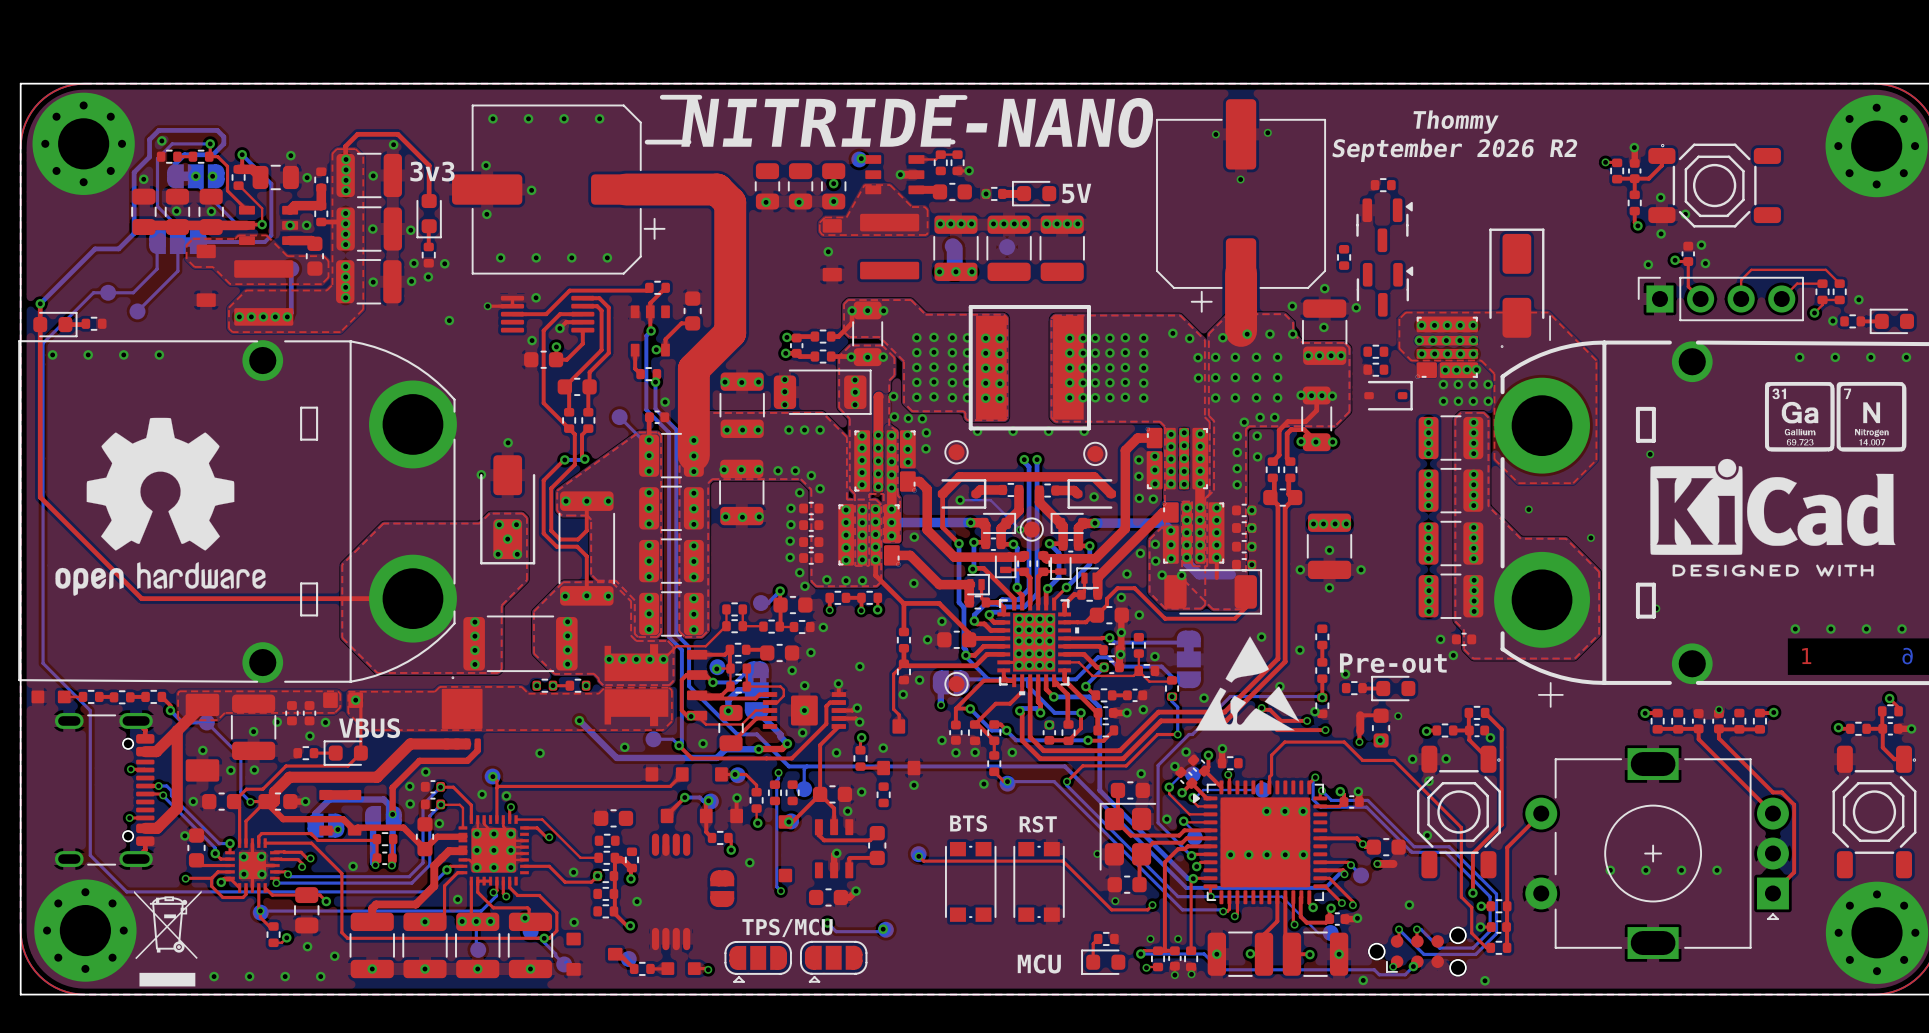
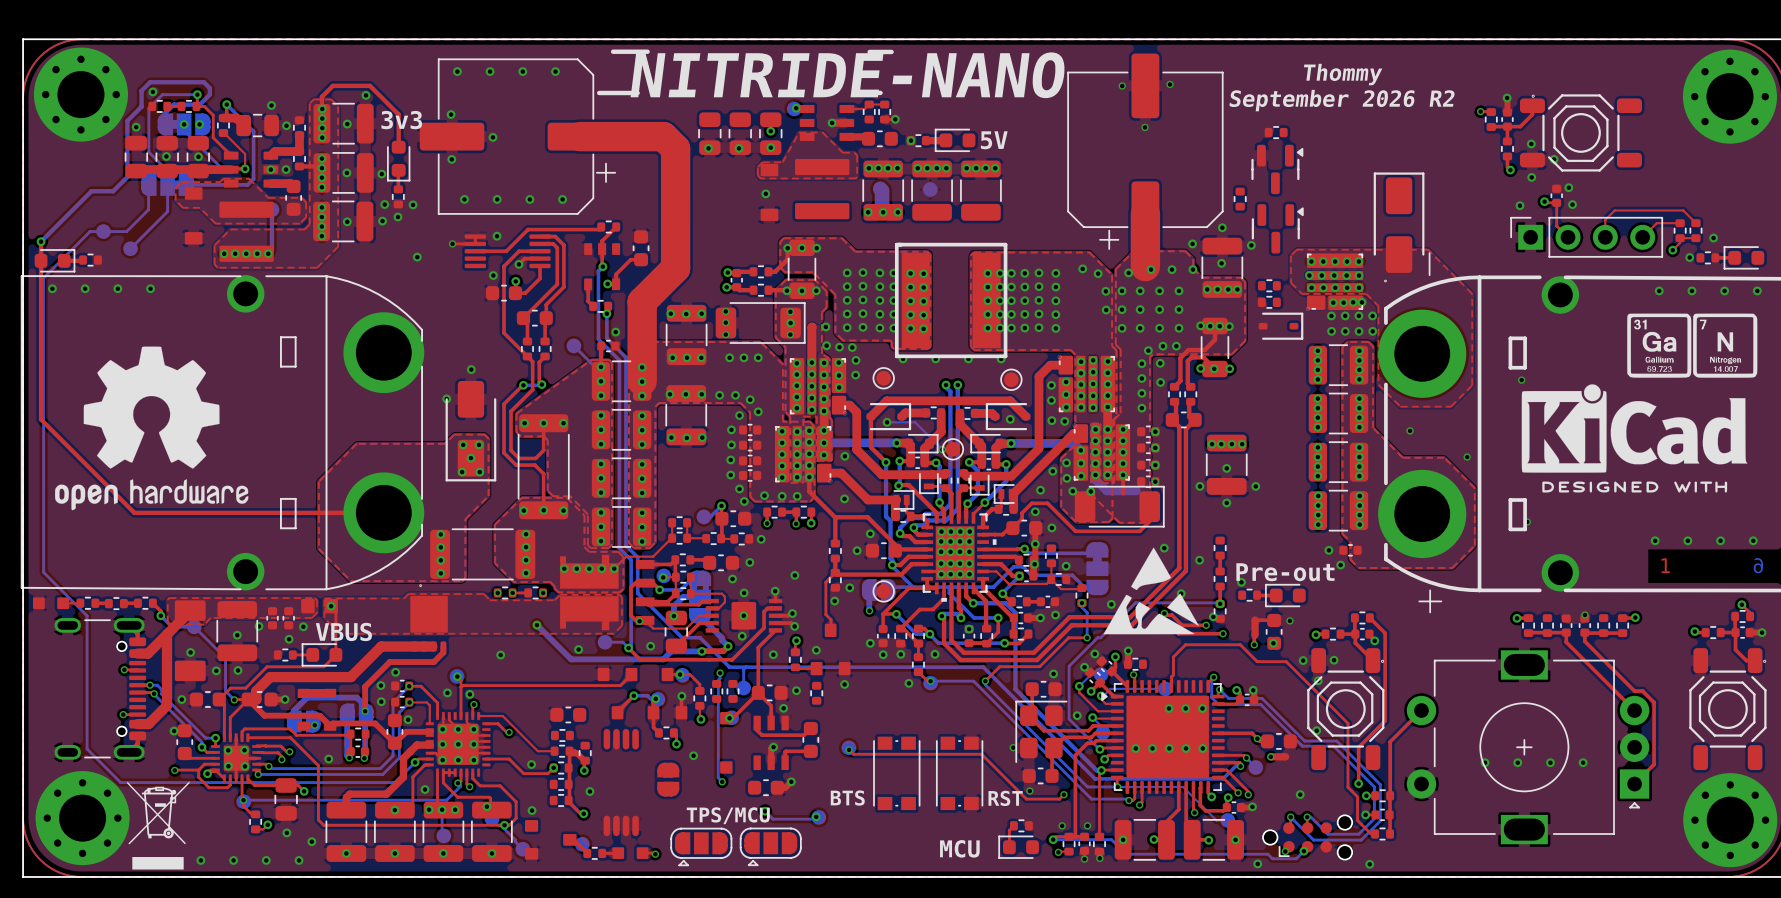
text position: BTS (968, 823) -> BTS (847, 798)
text position: RST (1038, 824) -> RST (1005, 798)

